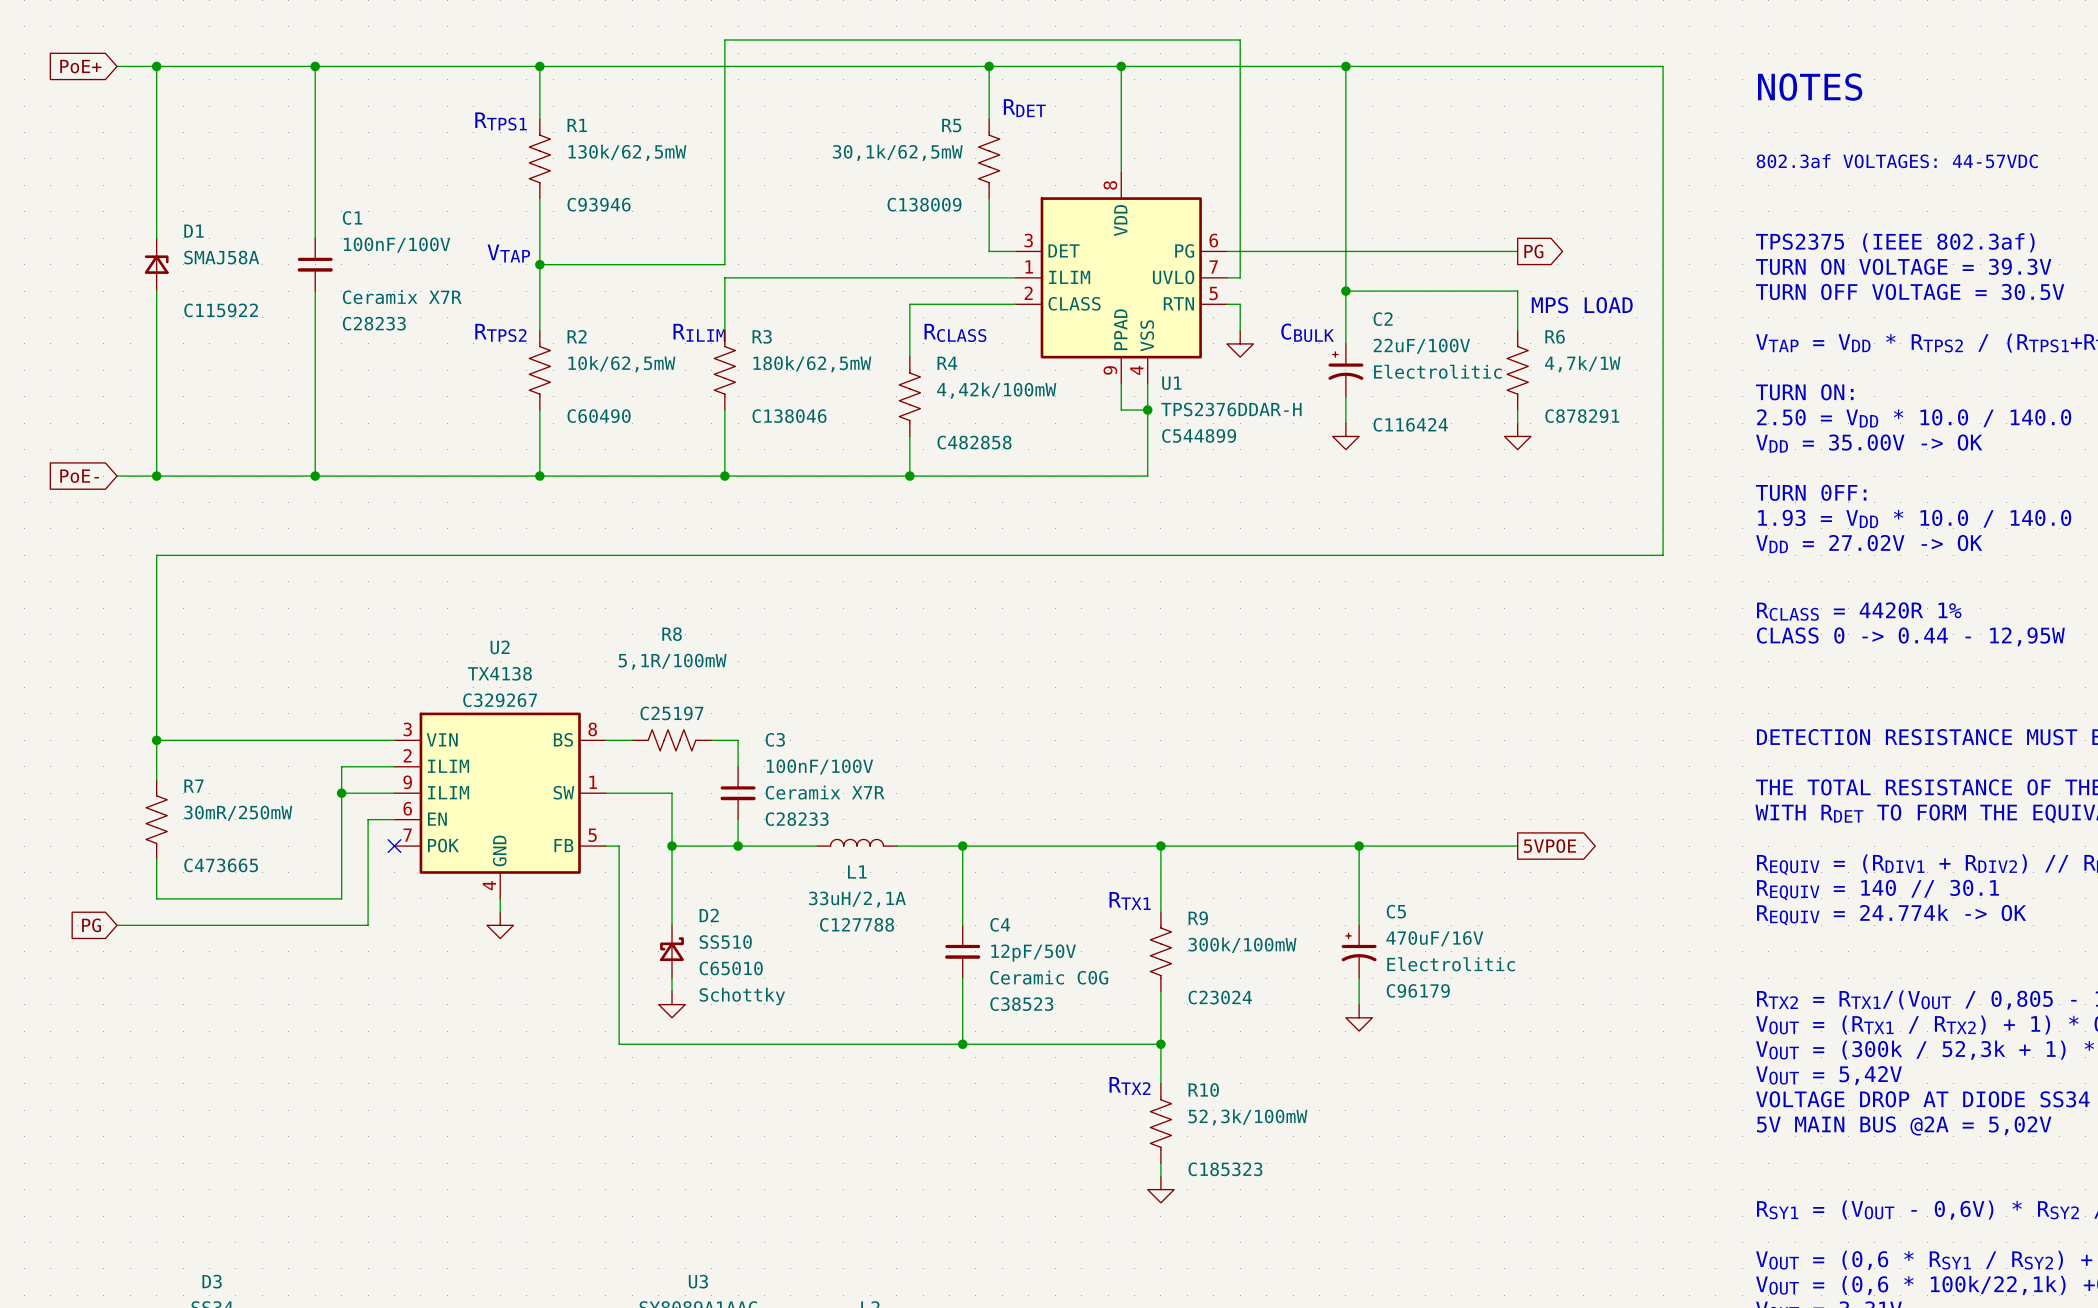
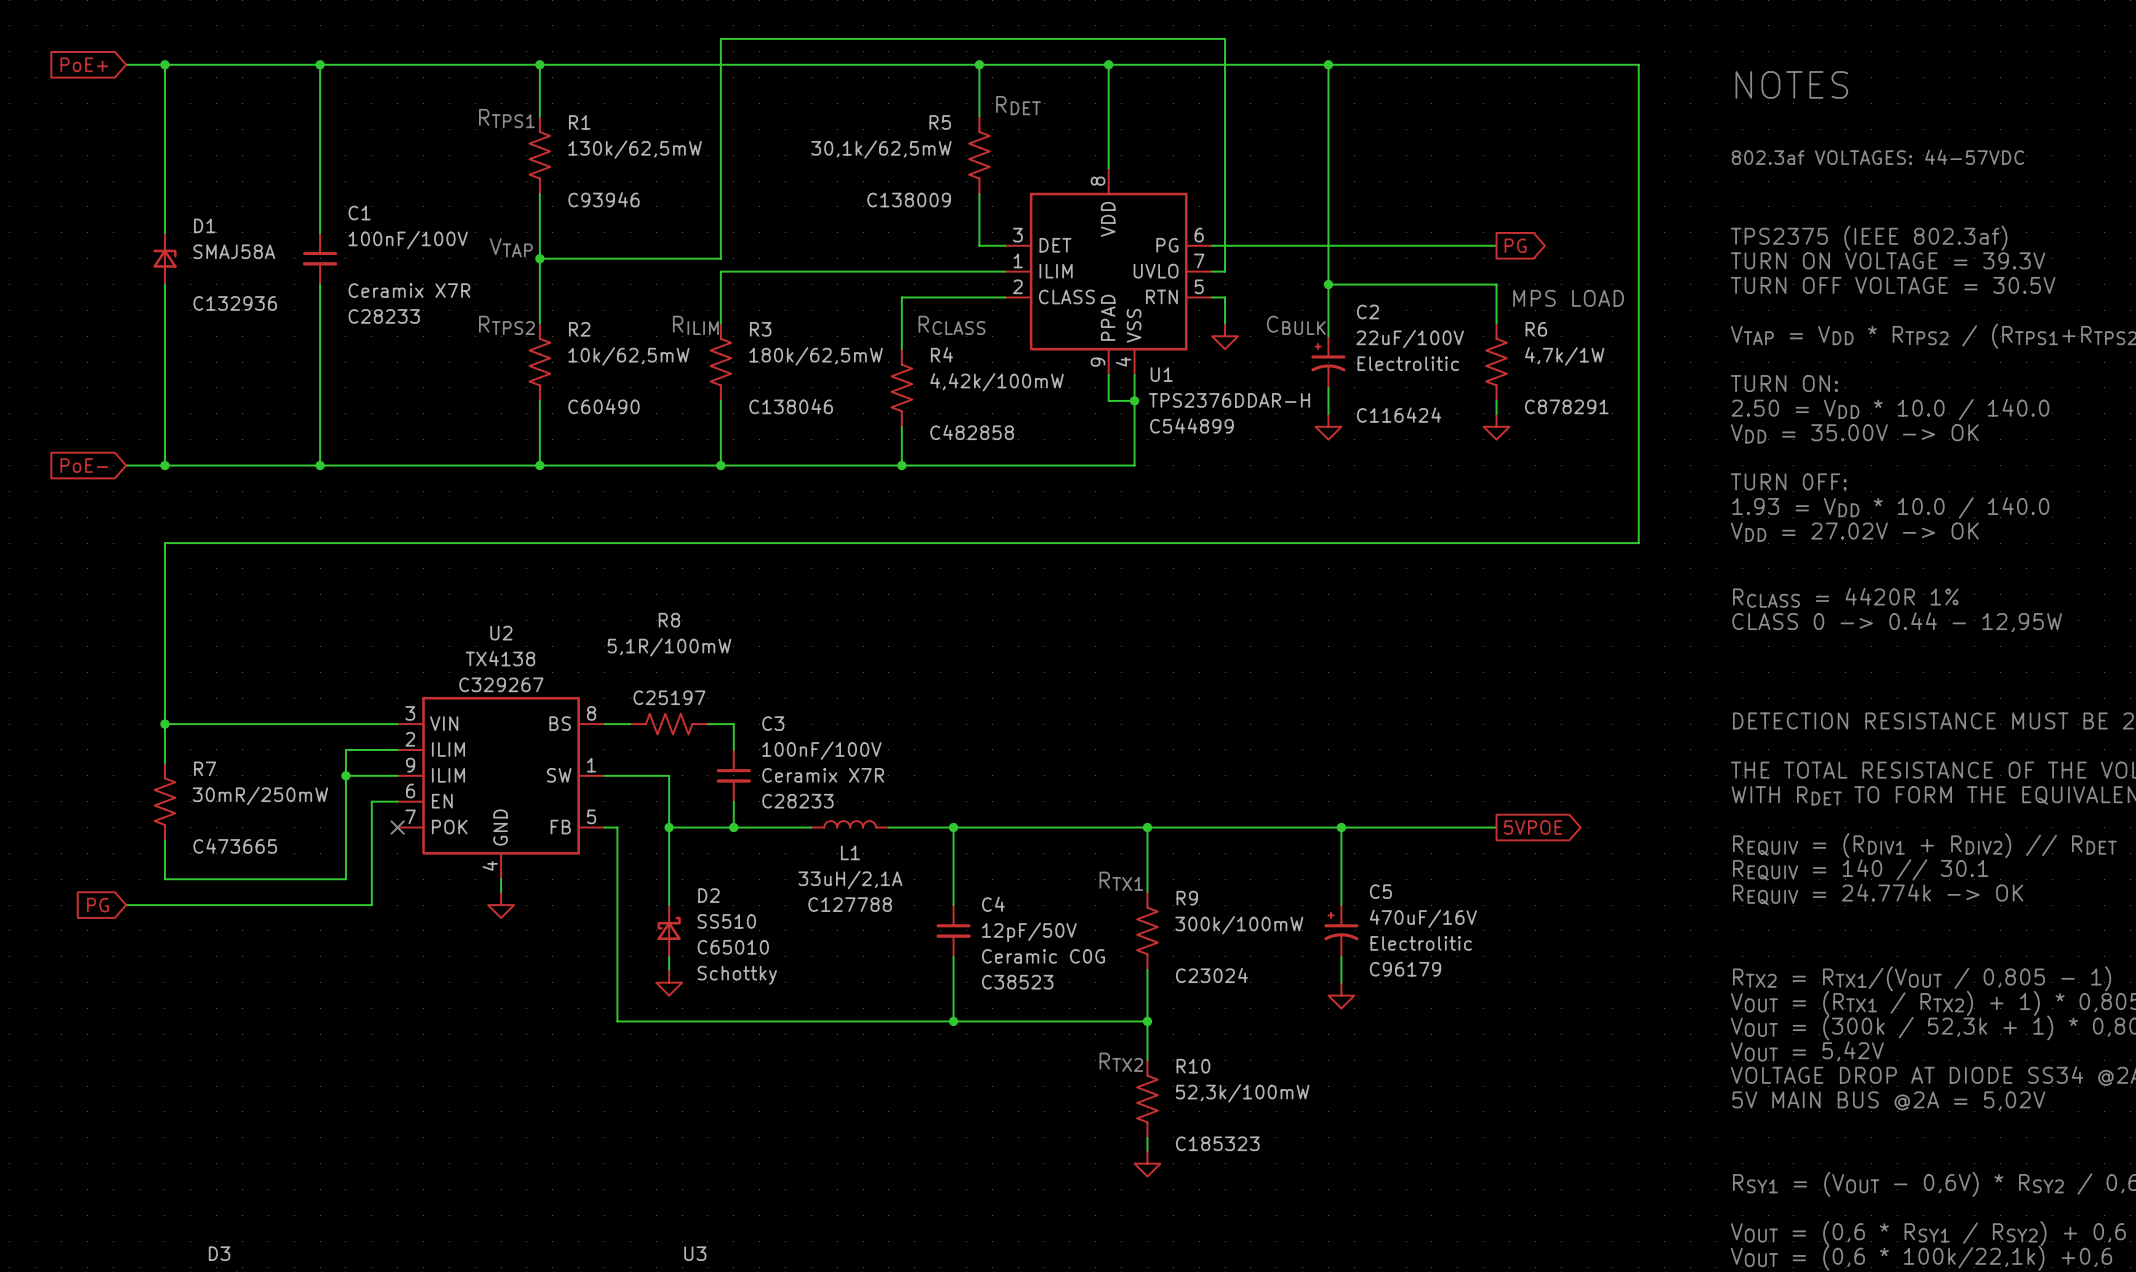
D1 text: C115922 (221, 310) -> C132936 (235, 303)

